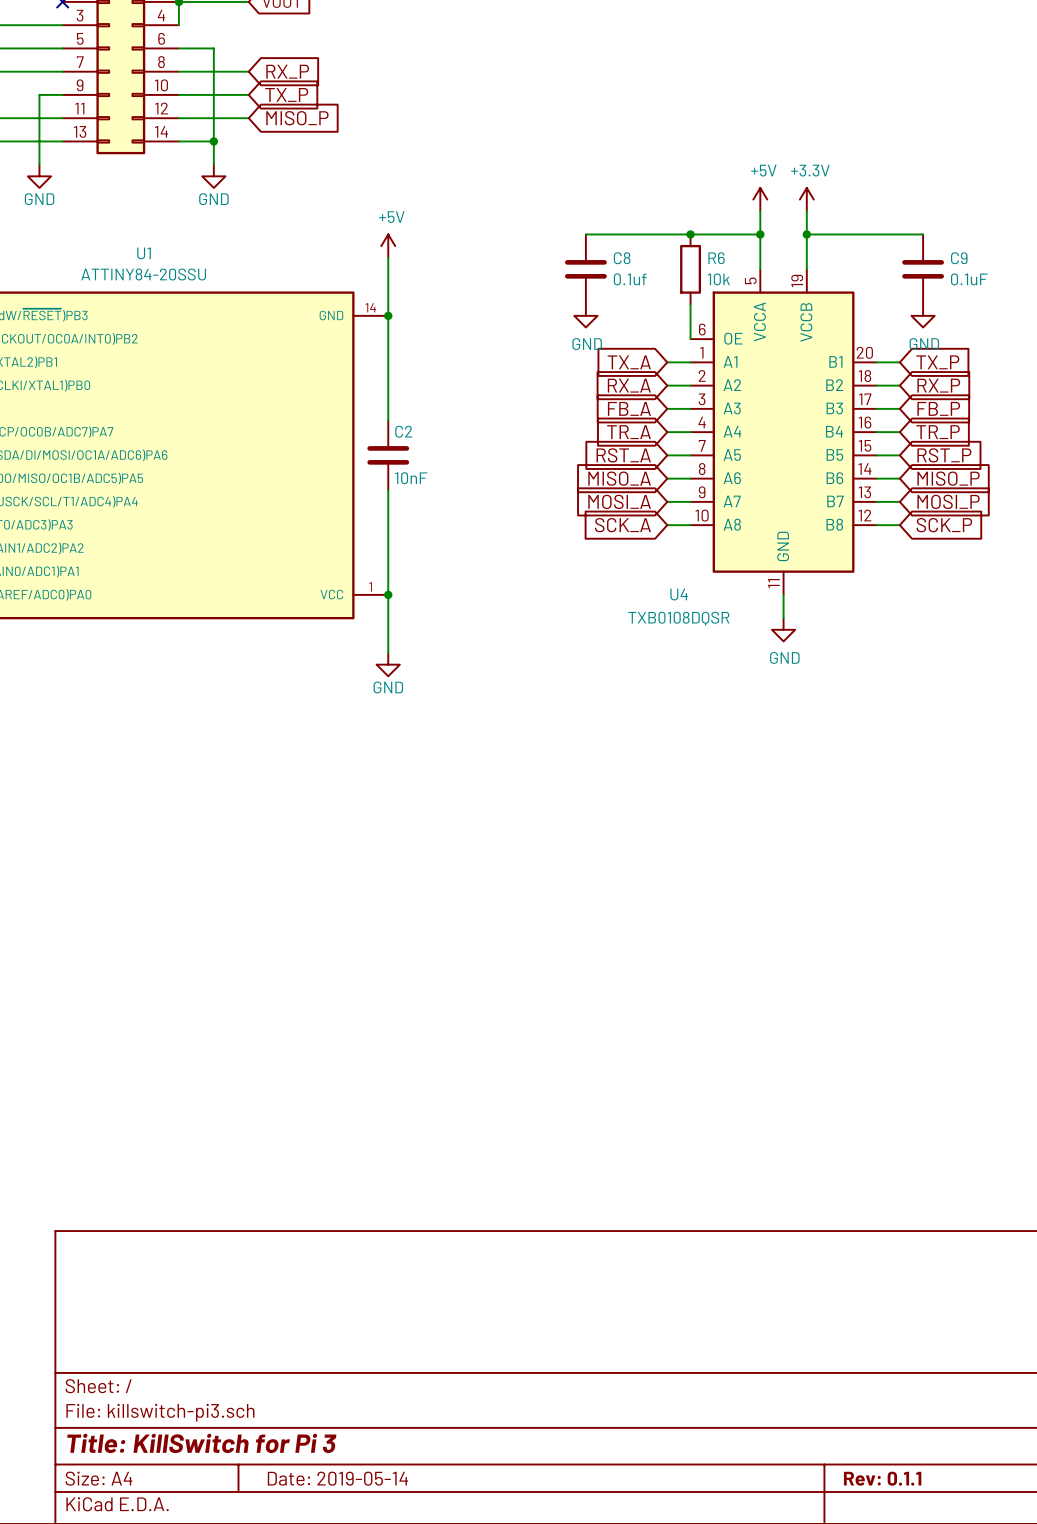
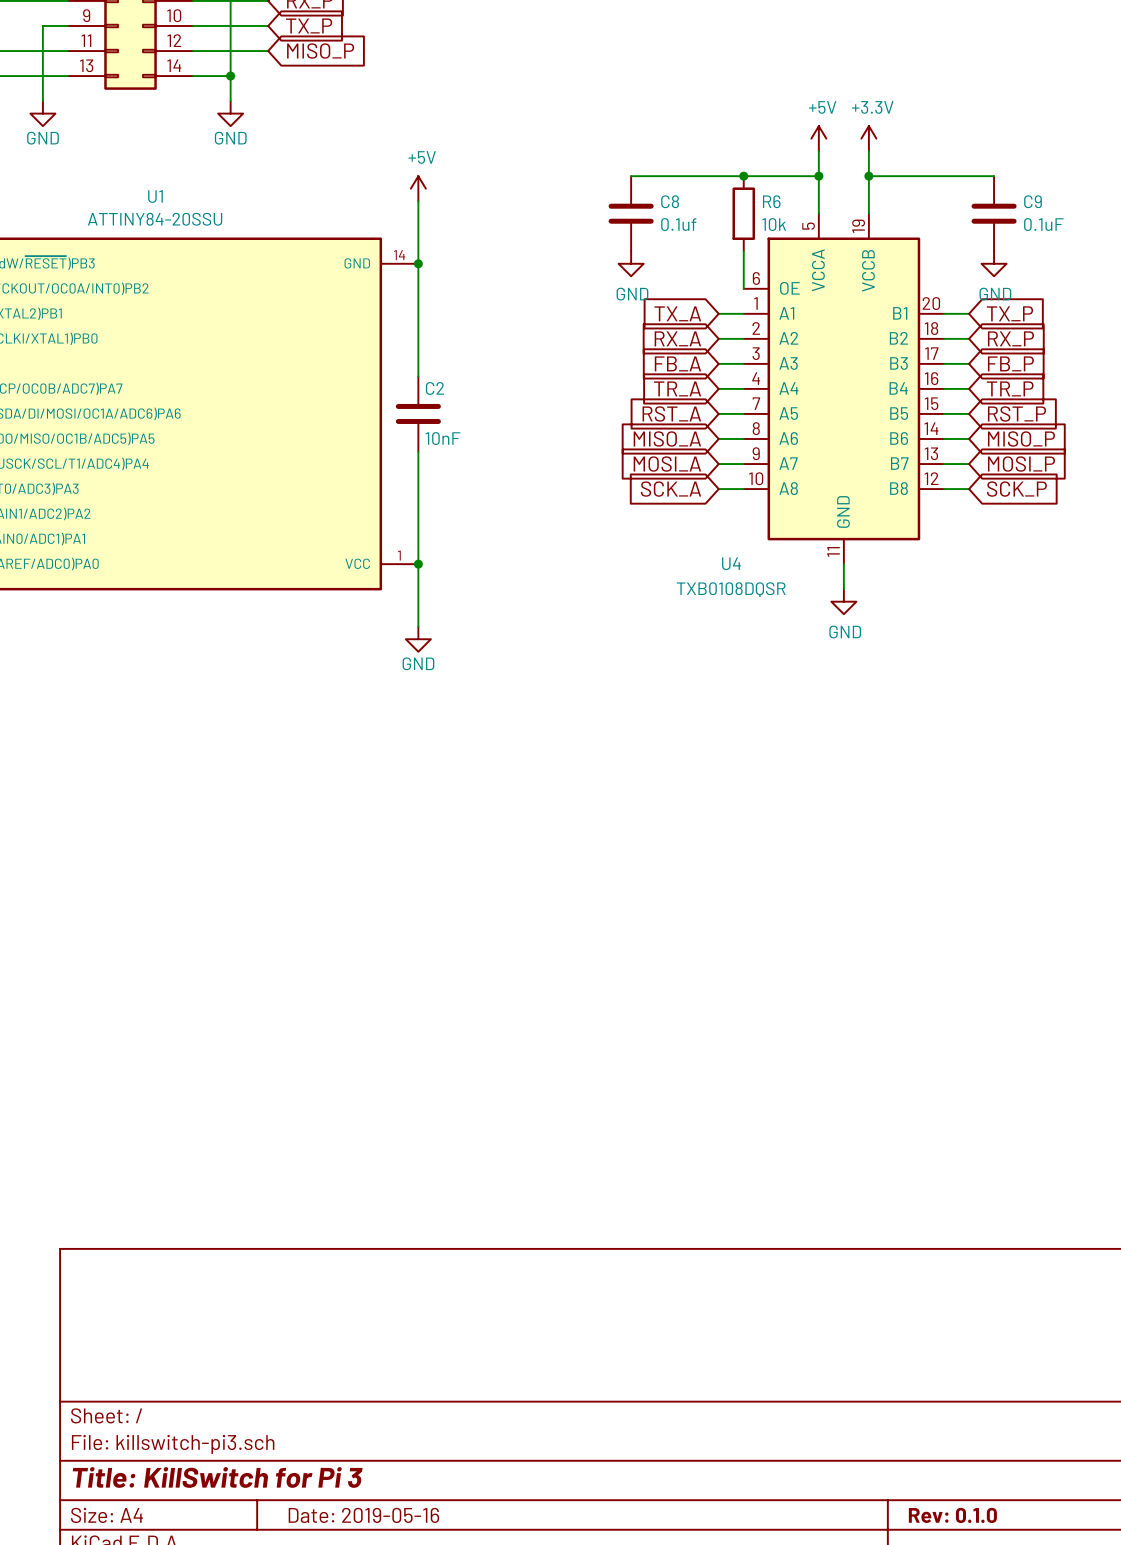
title block: Date: 2019-05-14 (337, 1478) -> Date: 2019-05-16 (363, 1515)
title block: Rev: 0.1.1 (882, 1478) -> Rev: 0.1.0 (952, 1515)

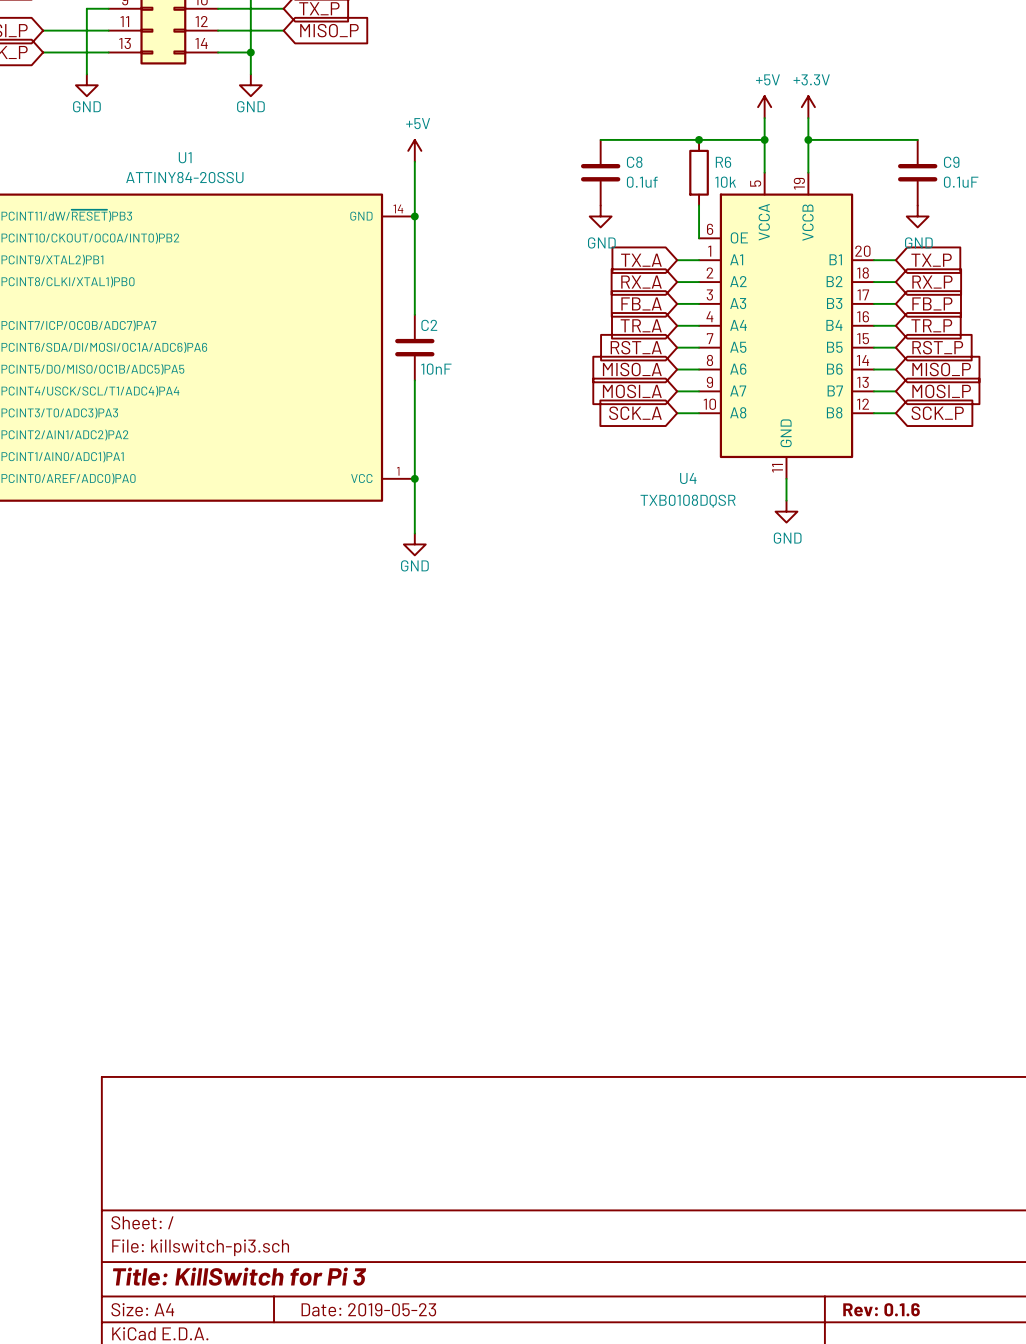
title block: Date: 2019-05-16 (363, 1515) -> Date: 2019-05-23 (368, 1309)
title block: Rev: 0.1.0 (952, 1515) -> Rev: 0.1.6 (881, 1309)

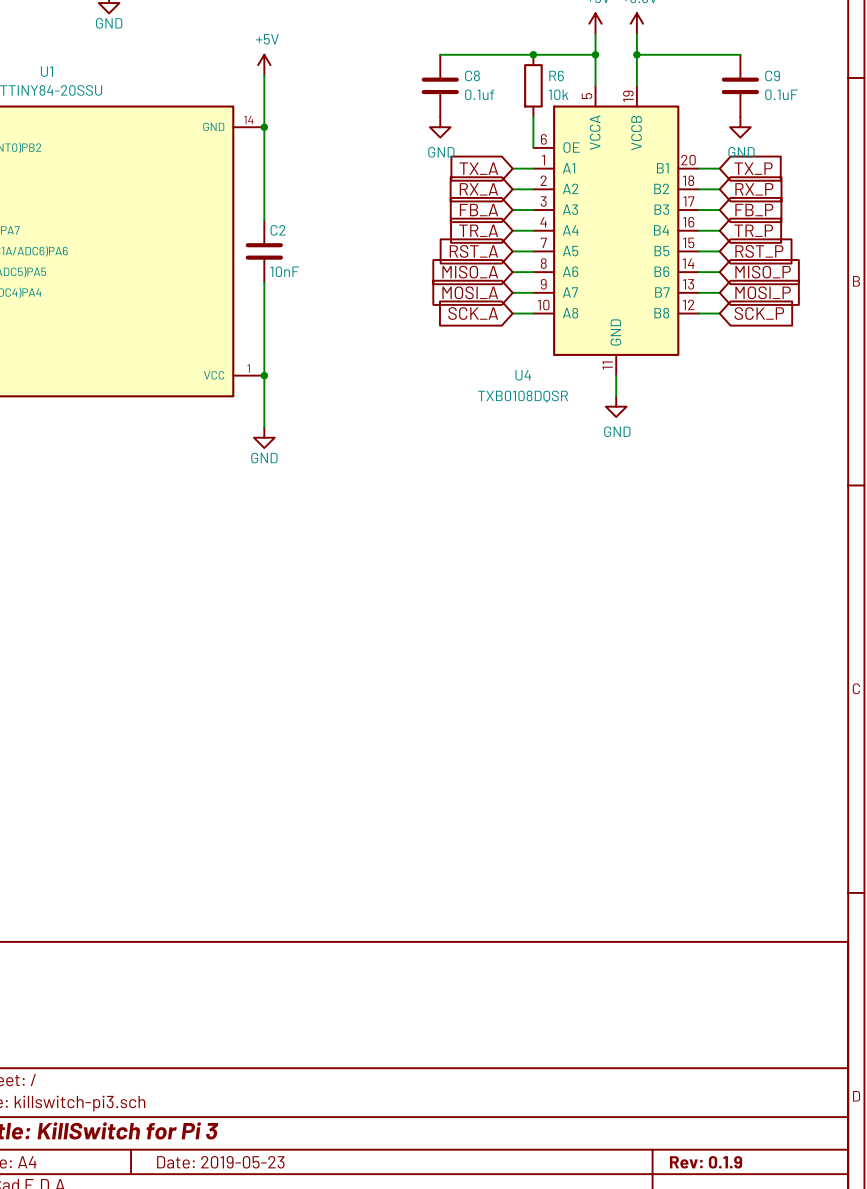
title block: Rev: 0.1.6 (881, 1309) -> Rev: 0.1.9 (706, 1162)

